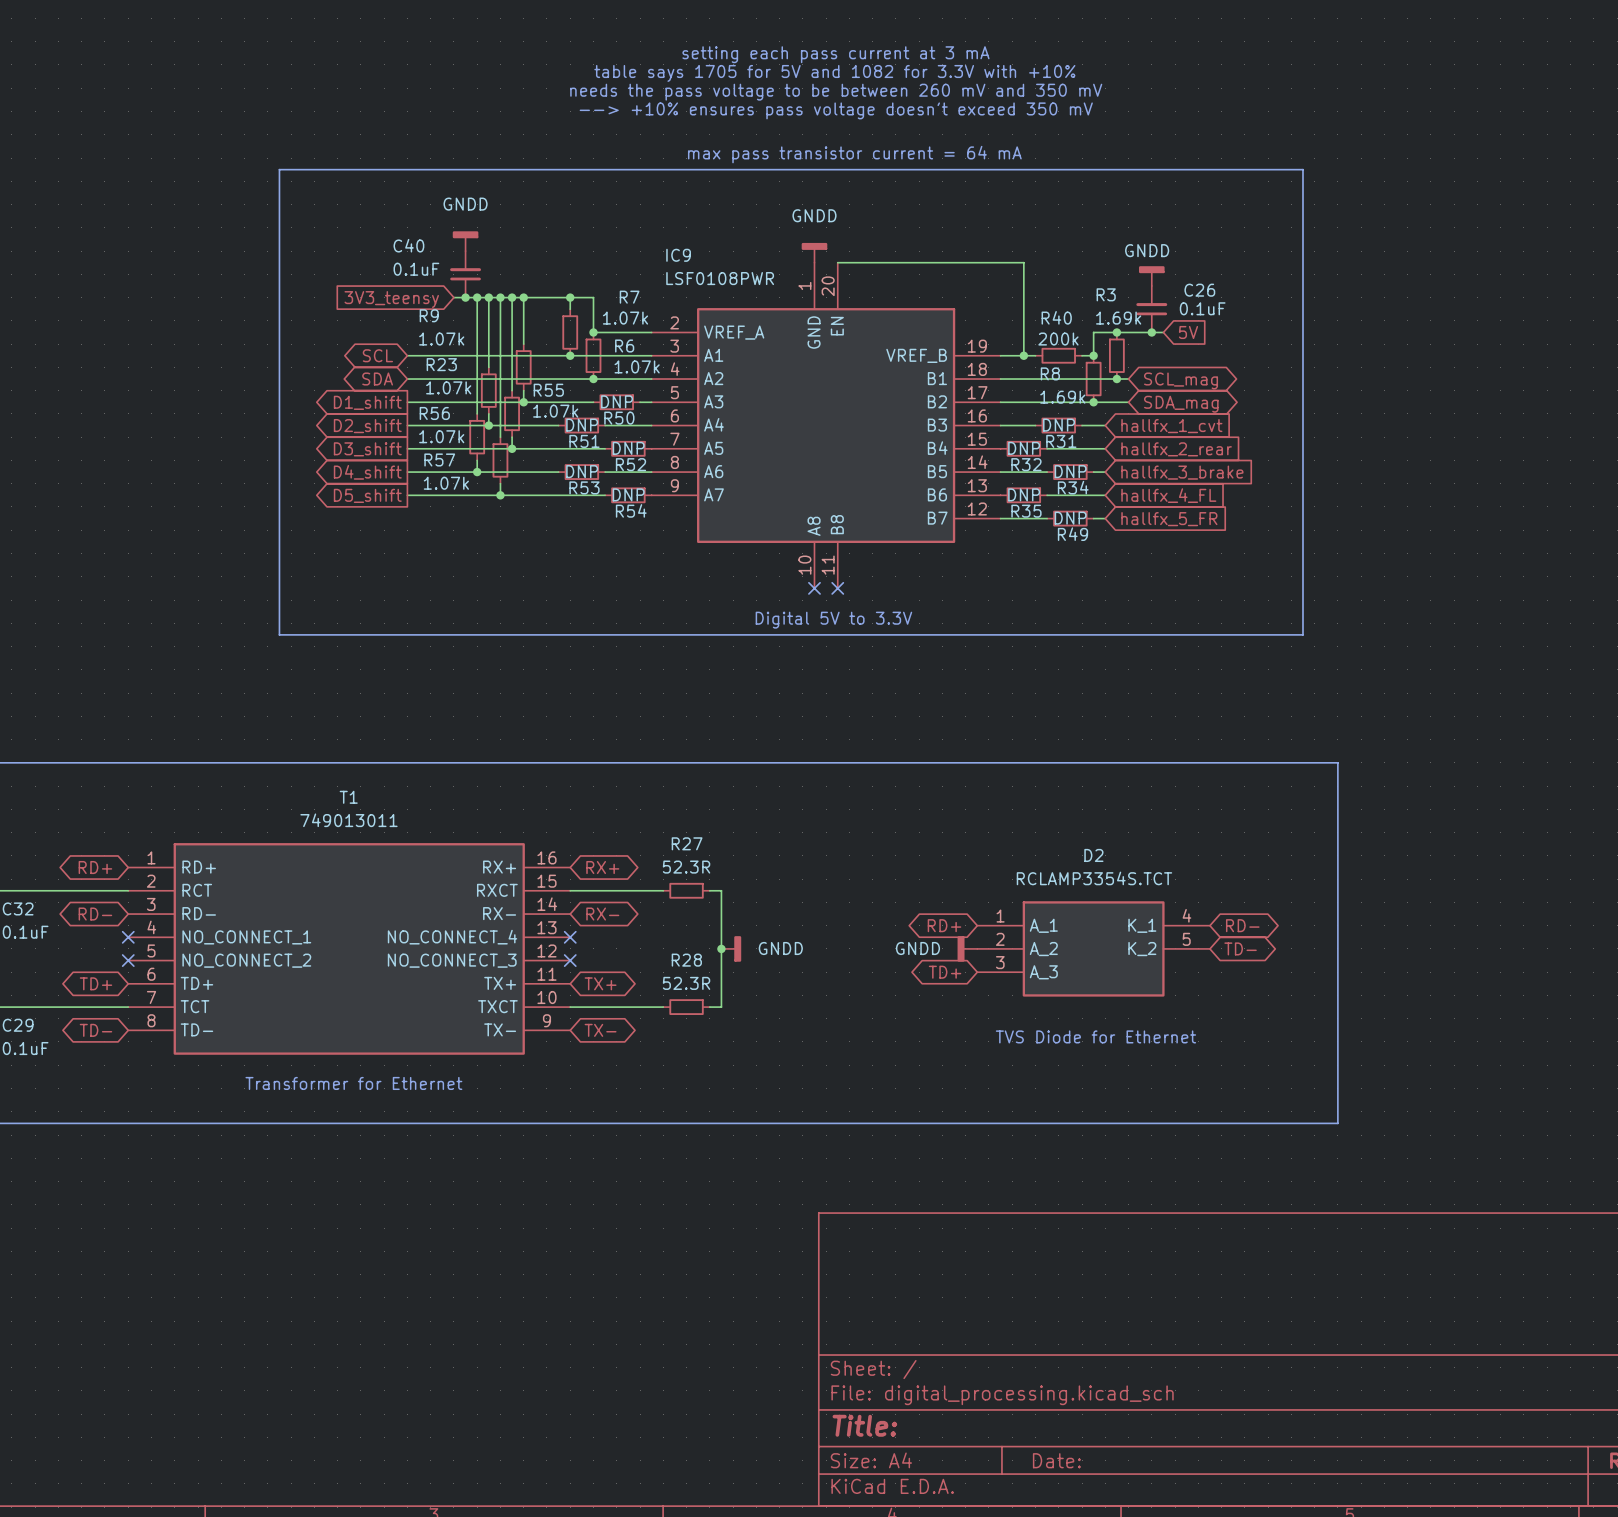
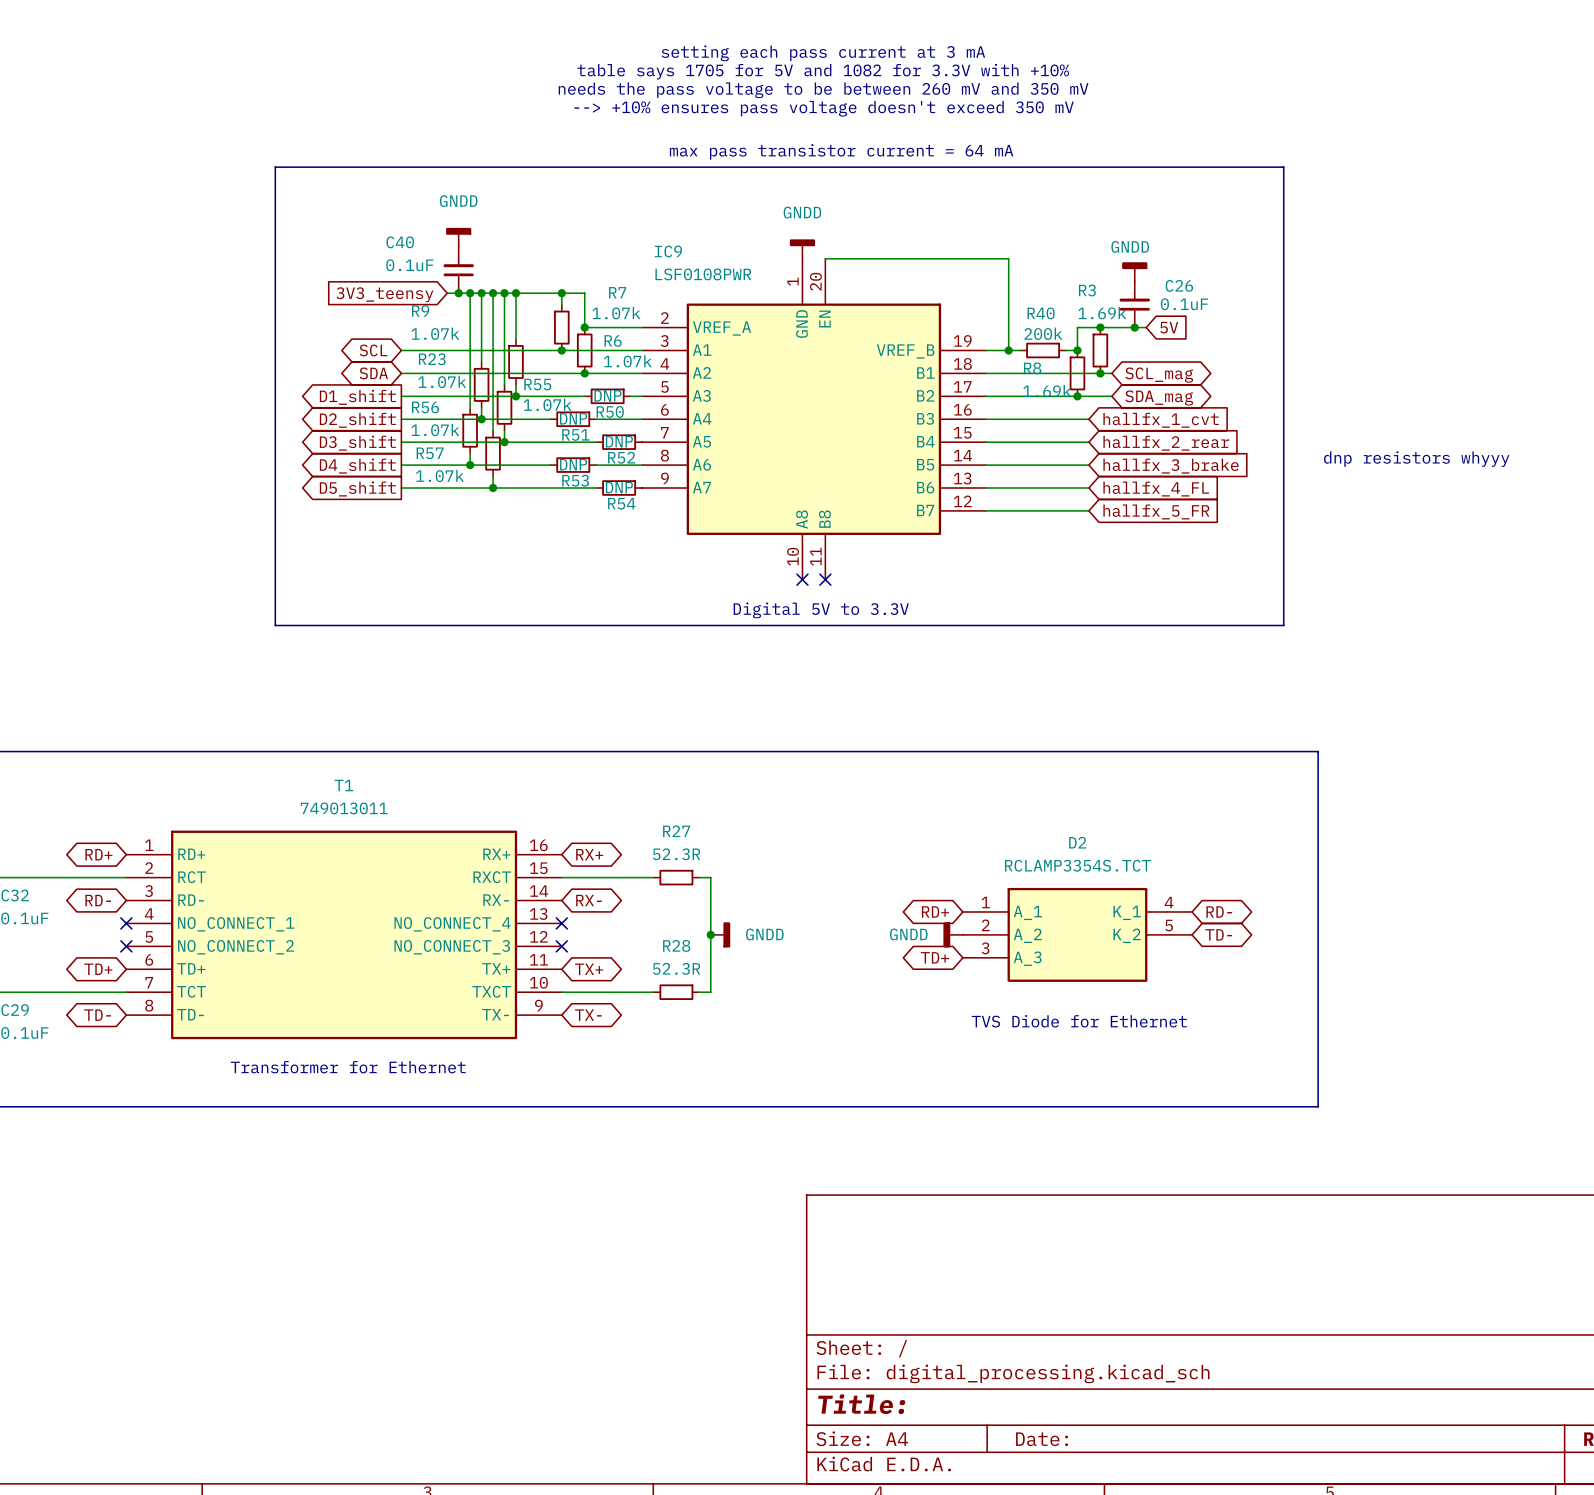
R31: DNP (1058, 425) -> none
R32: DNP (1023, 448) -> none
text: none -> dnp resistors whyyy (1416, 459)
R34: DNP (1070, 472) -> none
R35: DNP (1023, 495) -> none
R49: DNP (1070, 518) -> none

